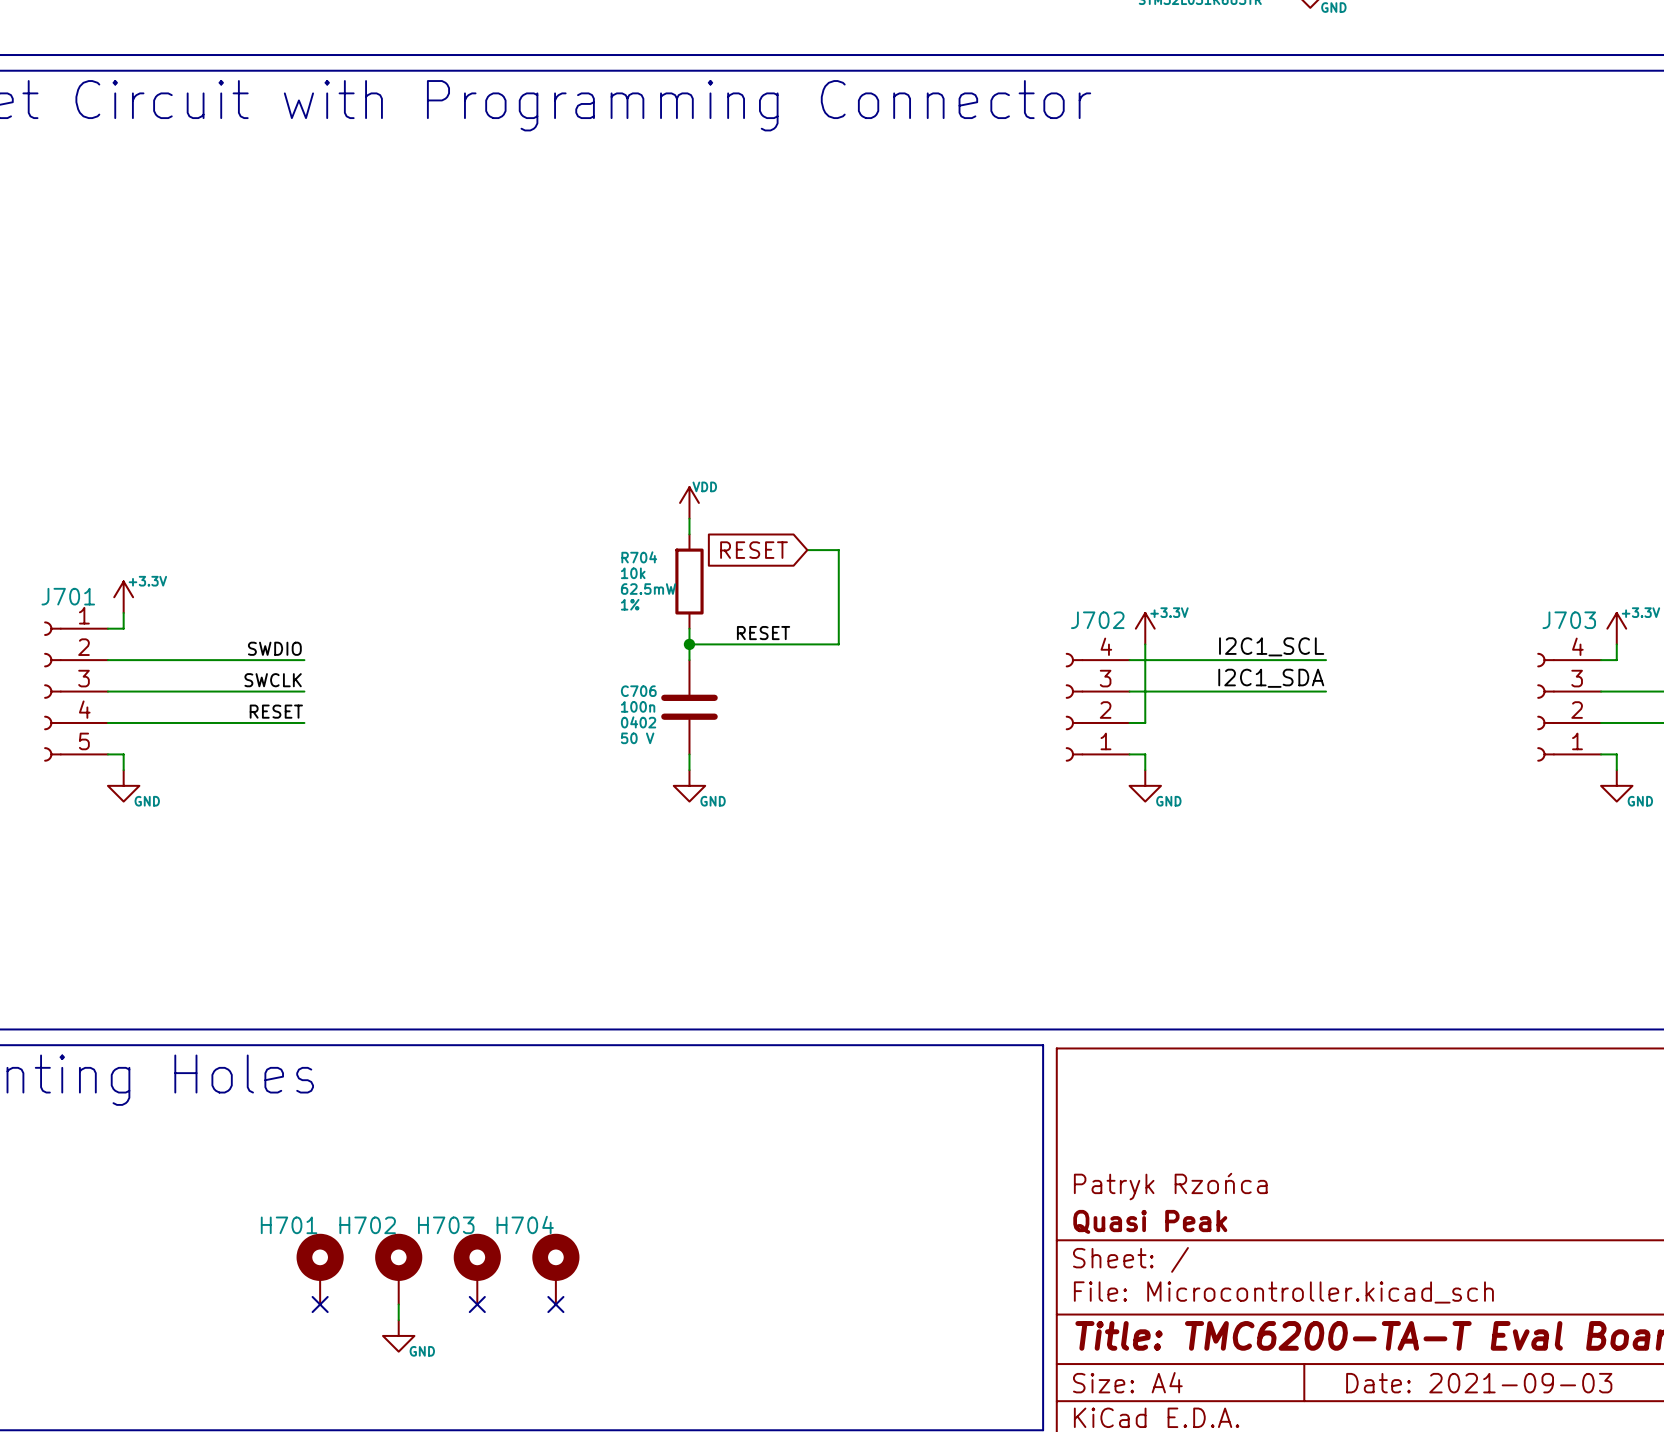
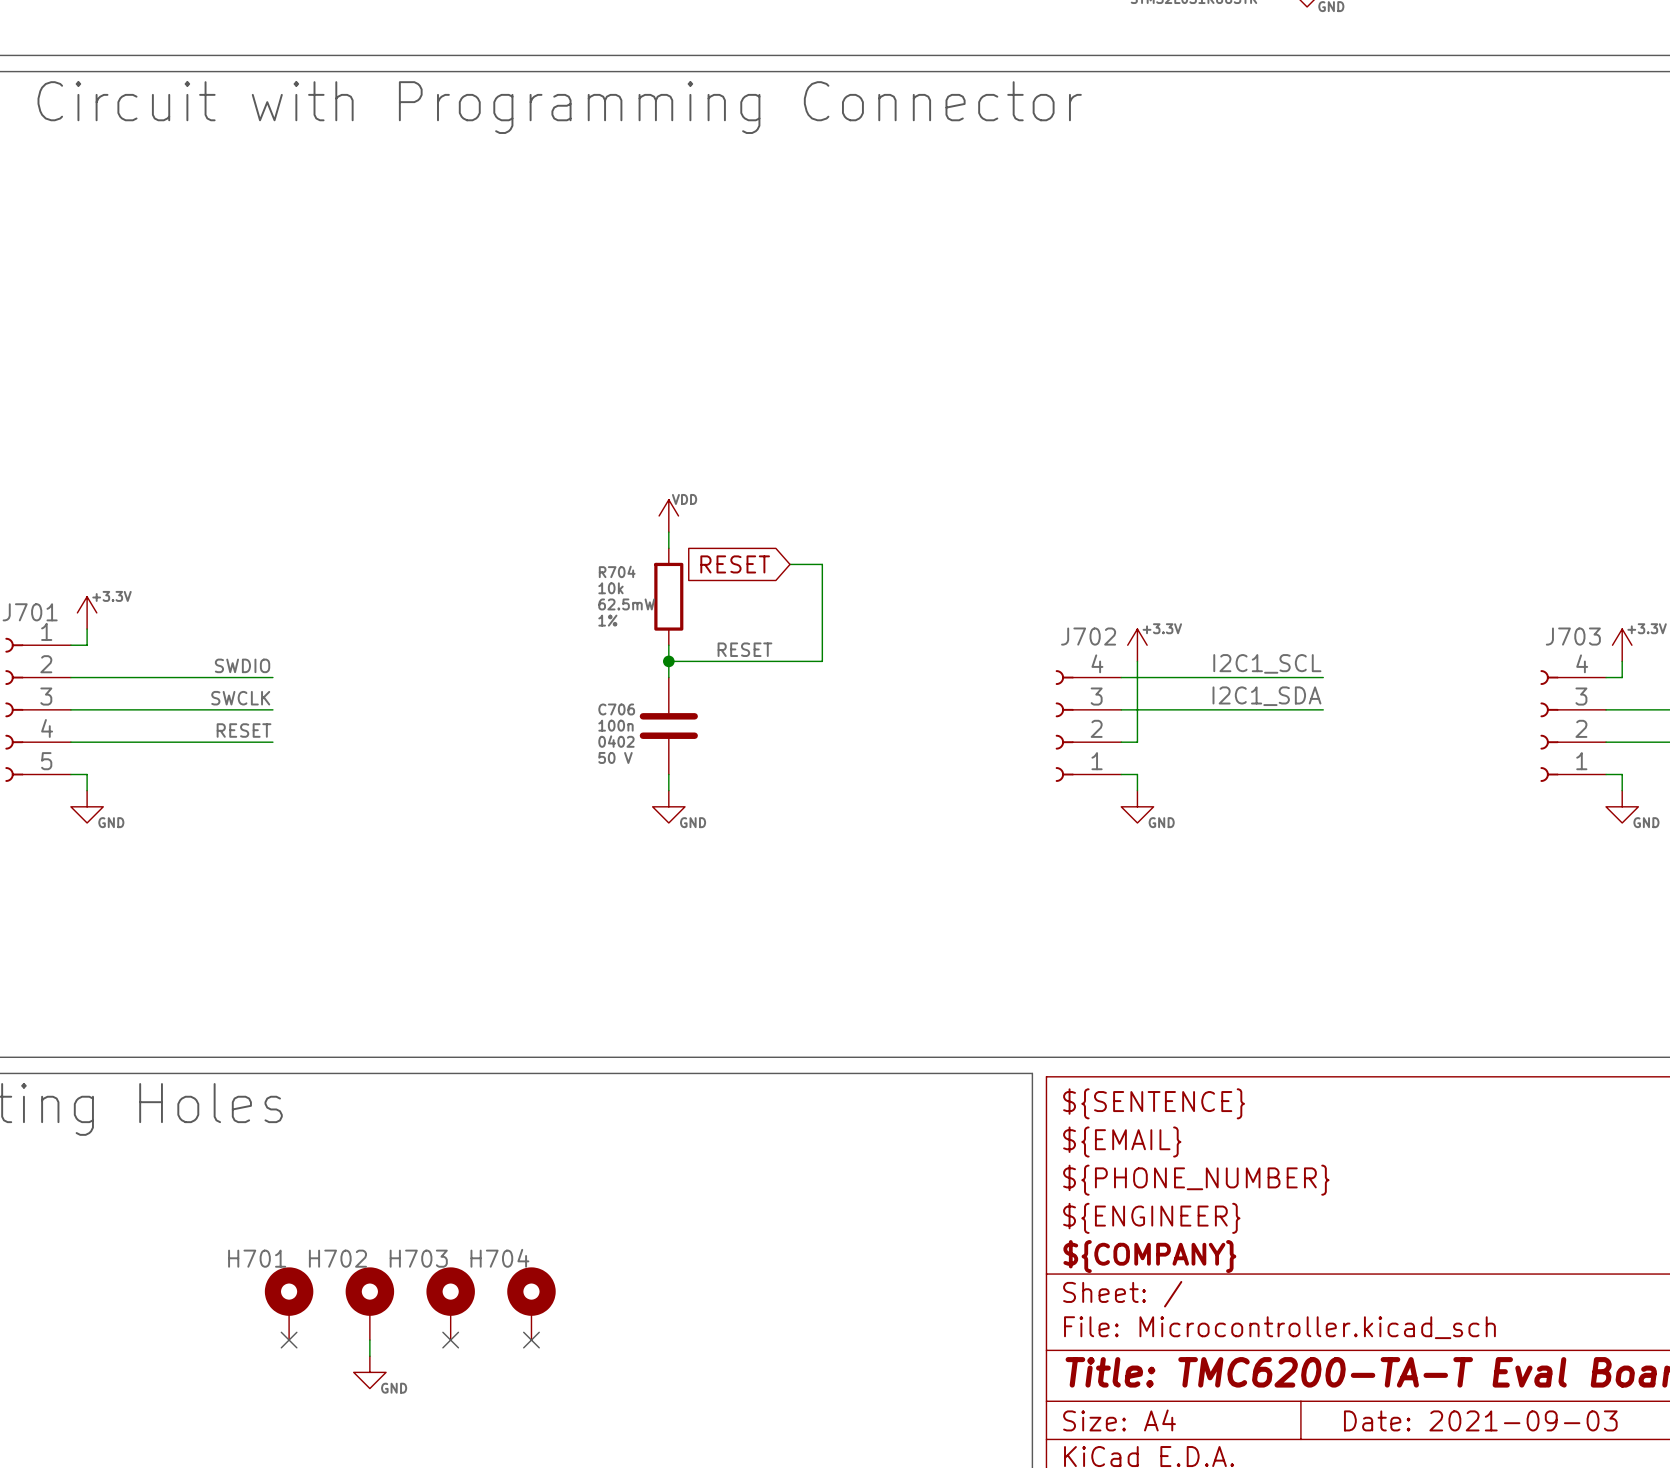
title block: none -> ${SENTENCE} (1154, 1103)
title block: none -> ${EMAIL} (1122, 1141)
title block: none -> ${PHONE_NUMBER} (1196, 1180)
title block: Patryk Rzońca (1170, 1186) -> ${ENGINEER} (1151, 1218)
title block: Quasi Peak (1150, 1221) -> ${COMPANY} (1149, 1256)

